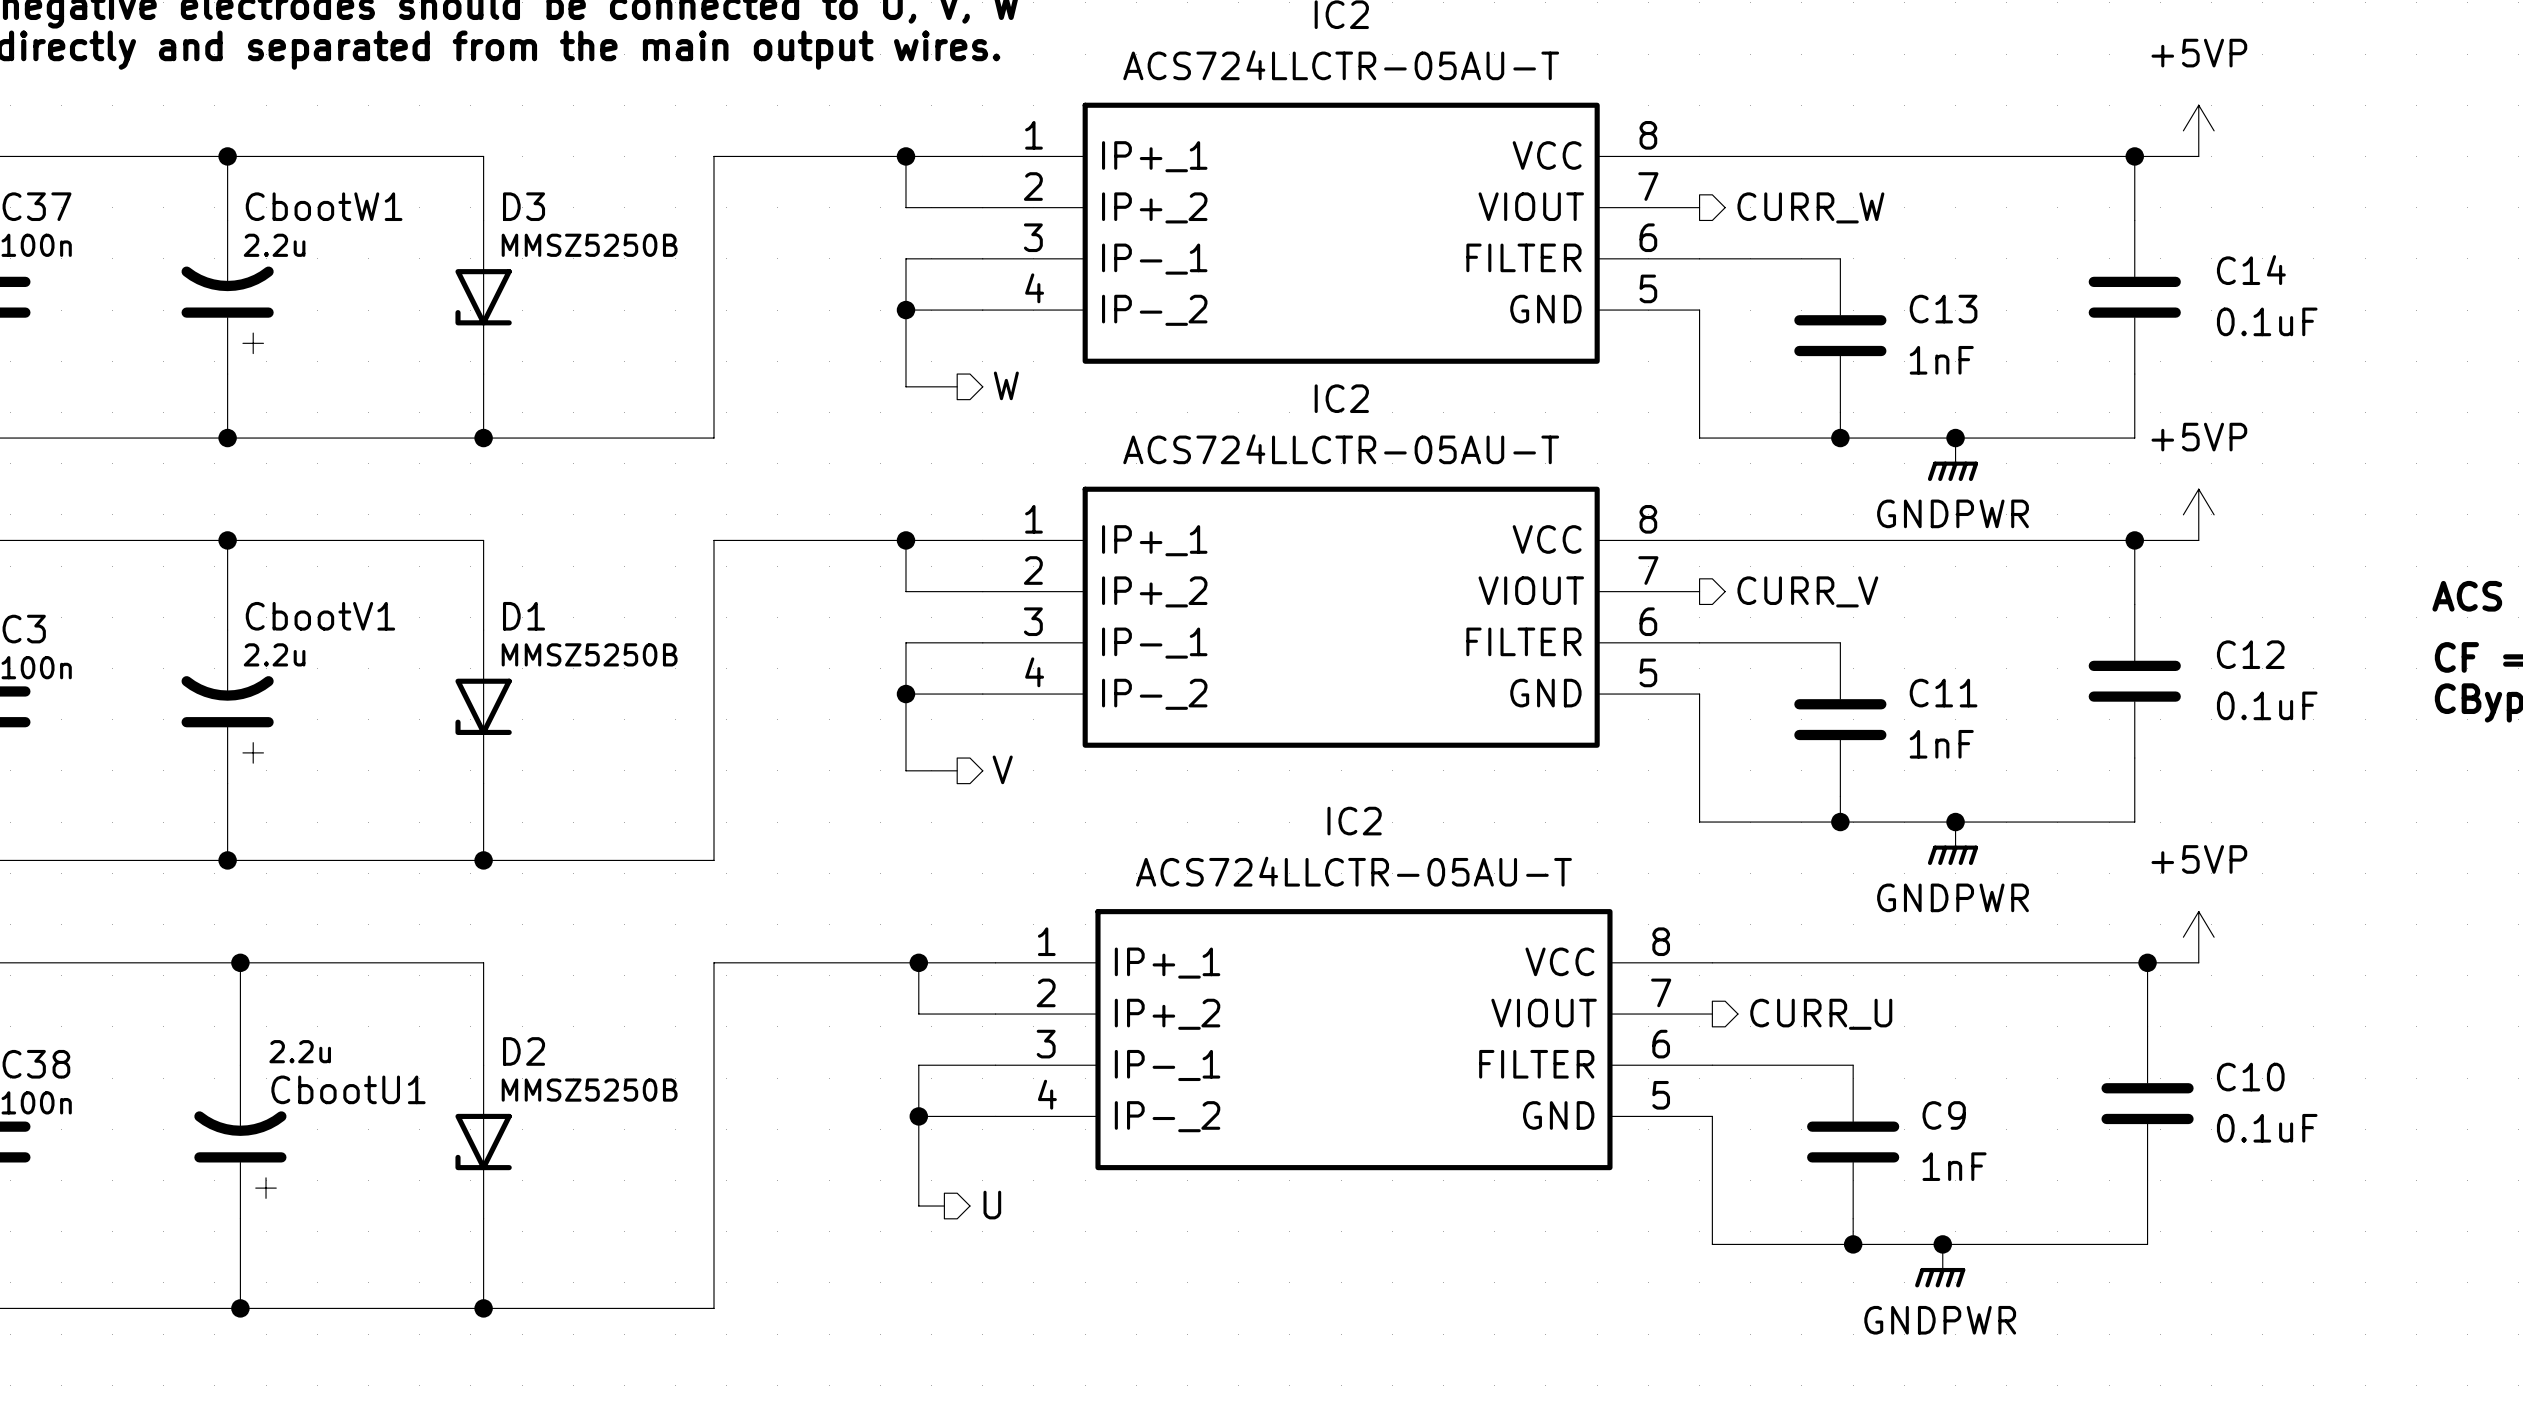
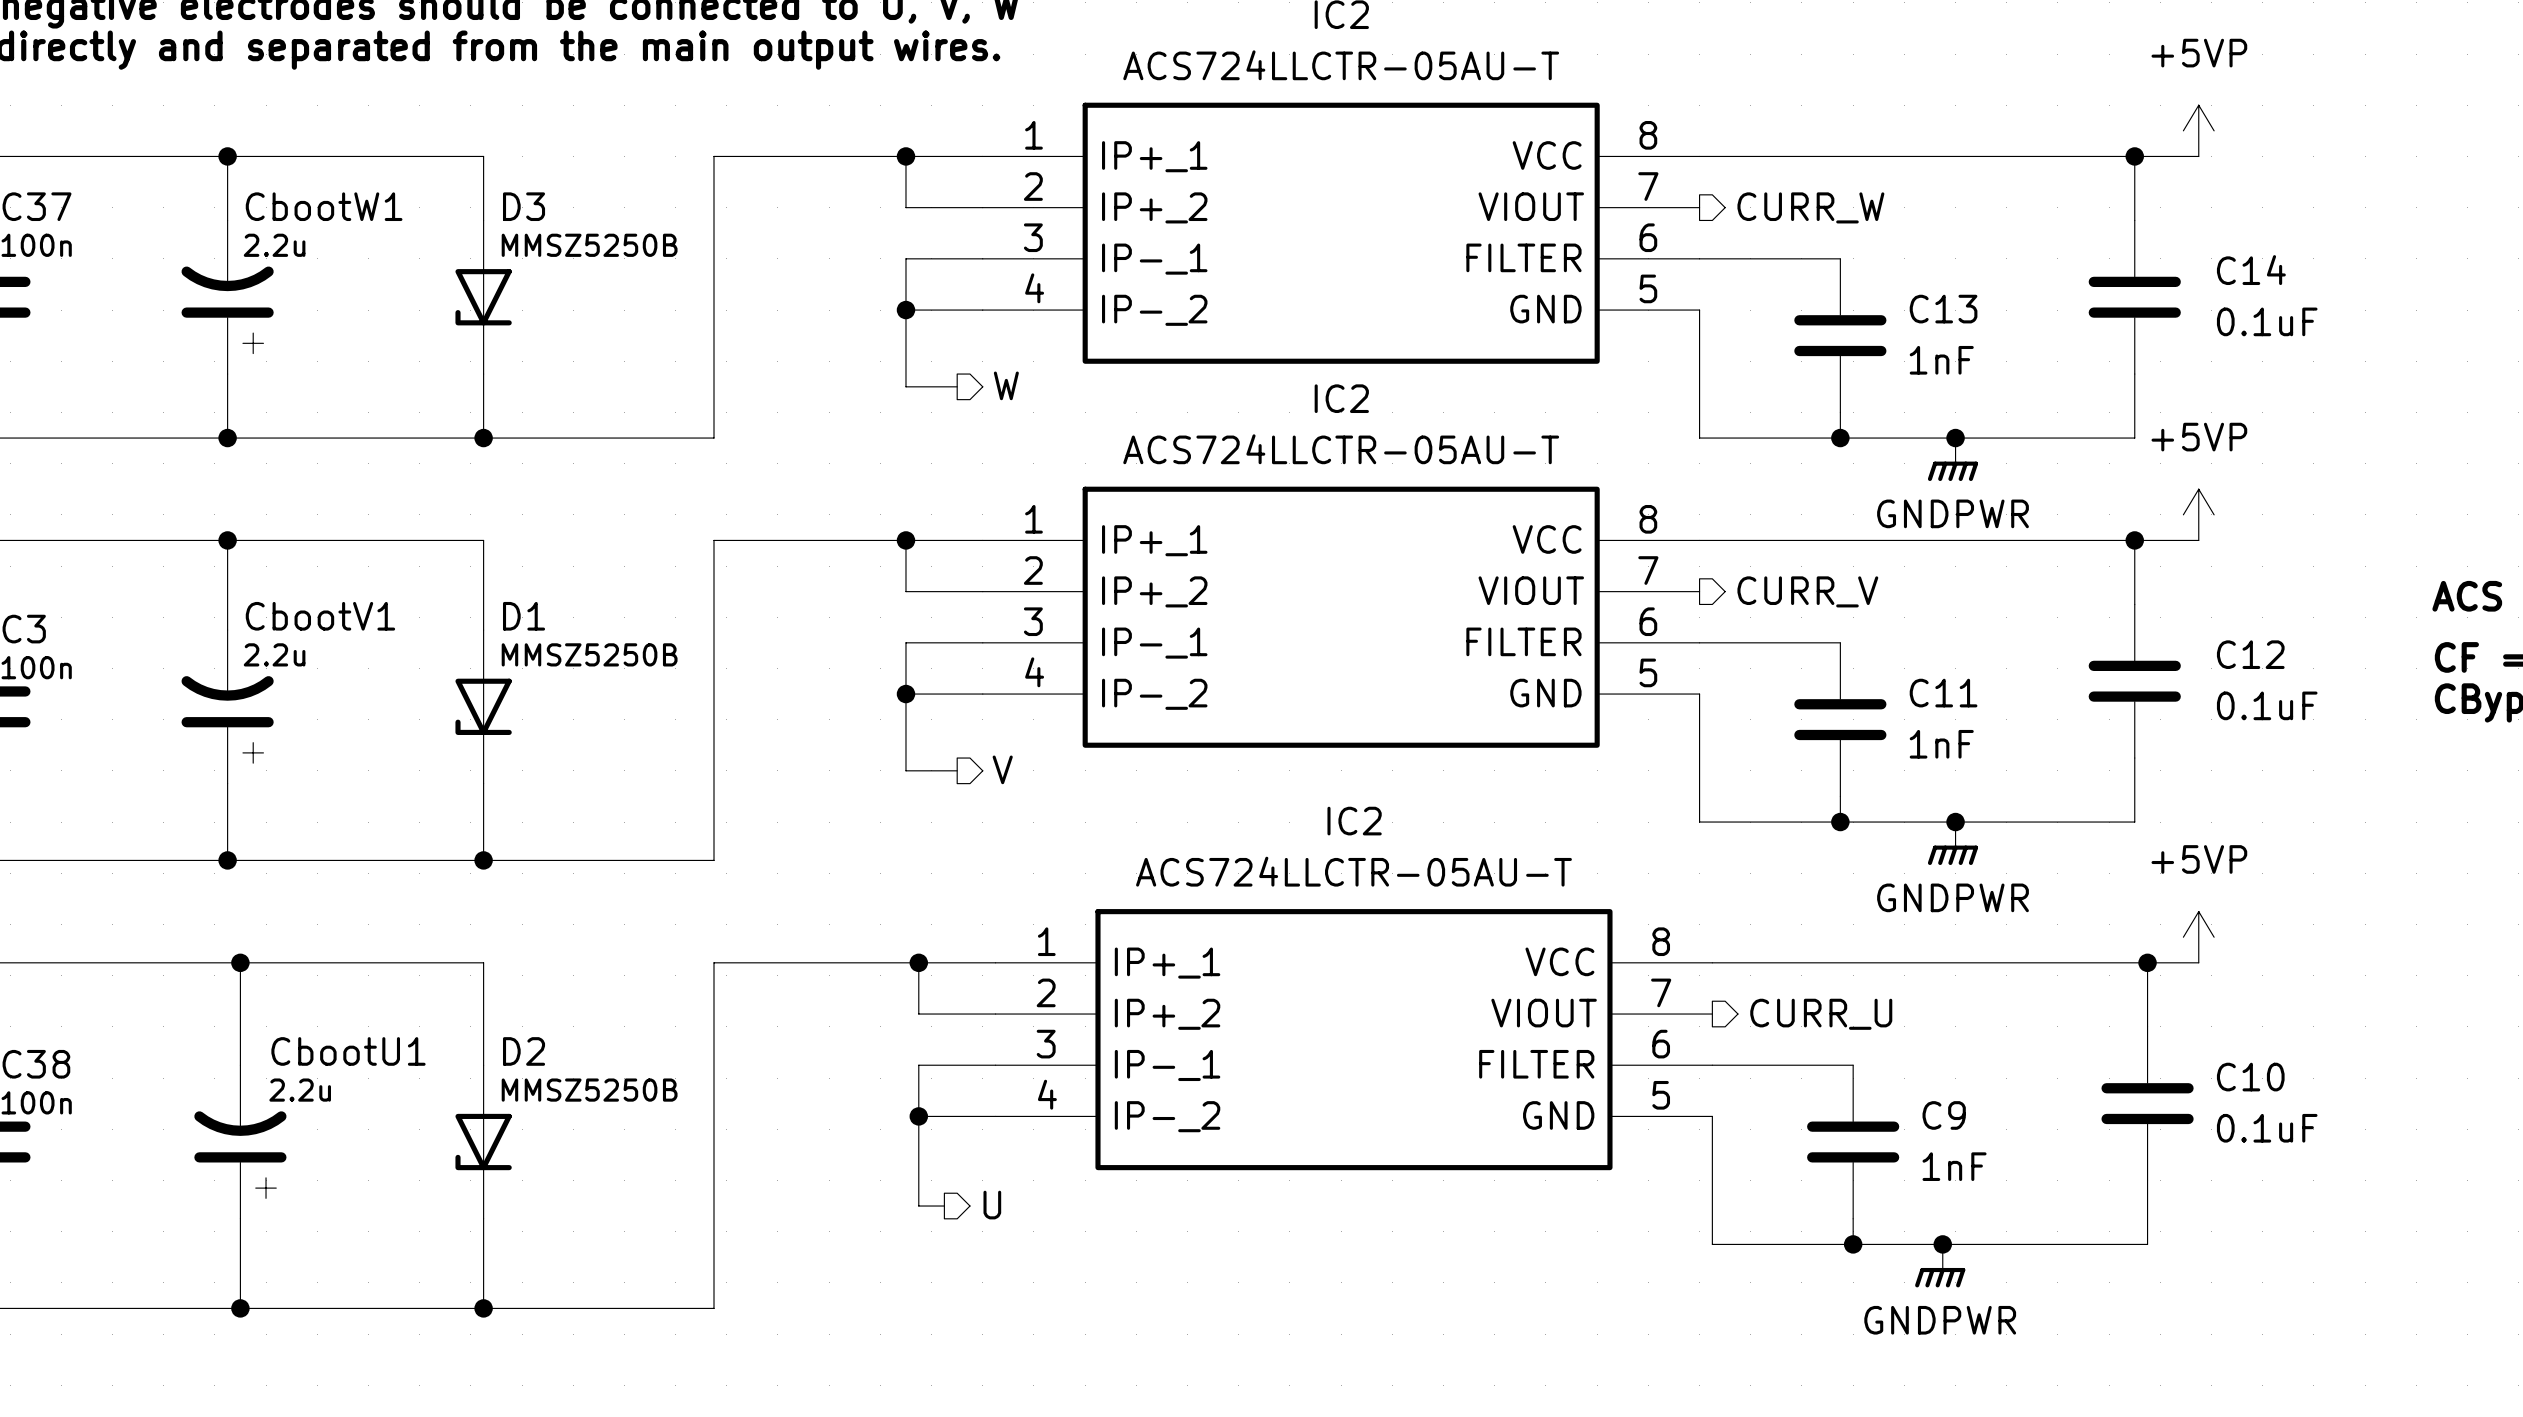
CbootU1 value position: 2.2u (300, 1051) -> 2.2u (300, 1090)
CbootU1 name position: CbootU1 (348, 1089) -> CbootU1 (348, 1051)

